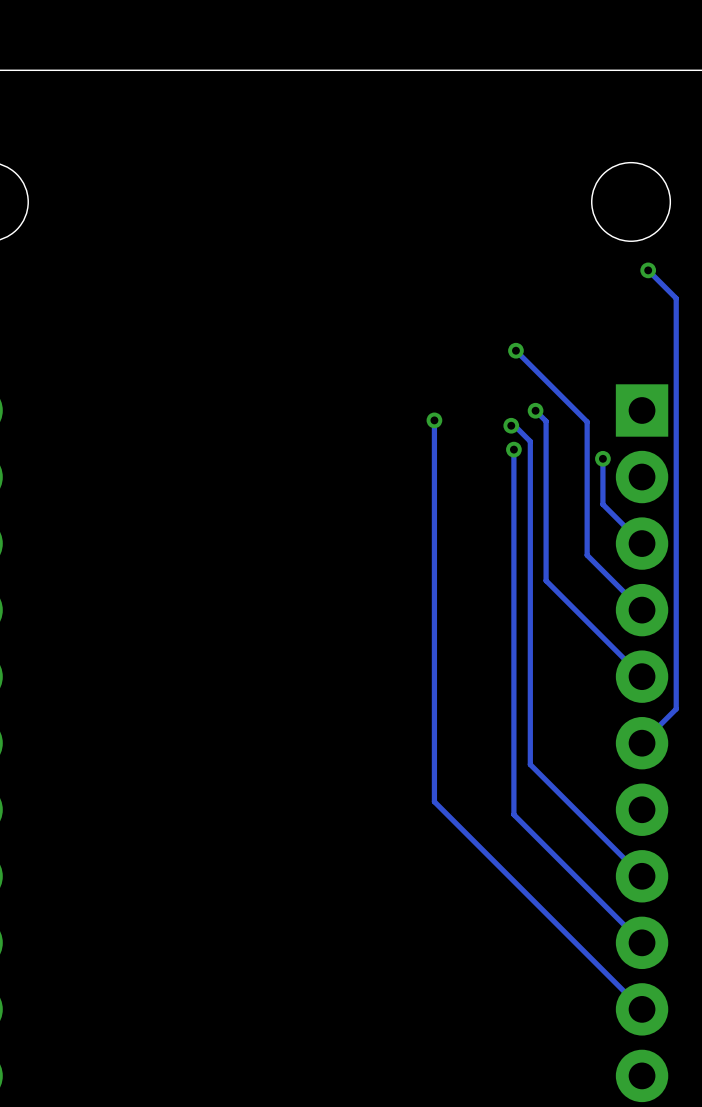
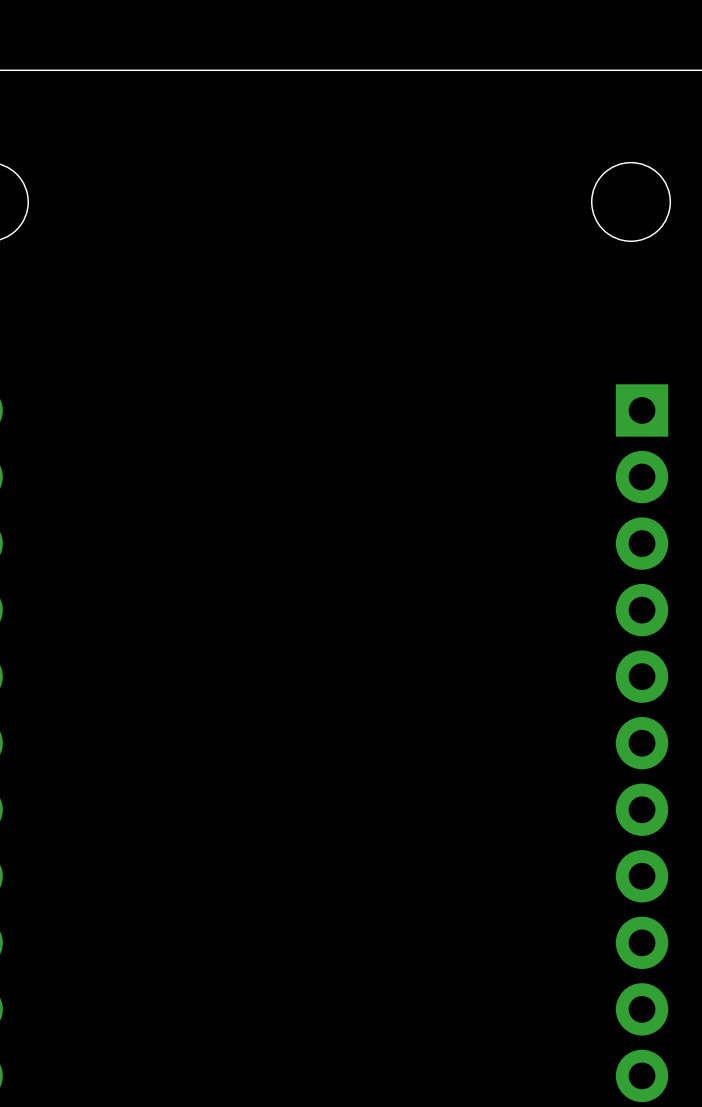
track: (648, 270) (676, 298) (676, 709) (642, 743) -> none
via: (648, 270) -> none
track: (515, 350) (587, 421) (587, 555) (642, 610) -> none
via: (515, 350) -> none
track: (535, 409) (546, 421) (546, 580) (642, 676) -> none
via: (535, 410) -> none
track: (434, 420) (434, 801) (642, 1009) -> none
via: (434, 420) -> none
track: (511, 425) (514, 425) (530, 441) (530, 764) (642, 876) -> none
via: (511, 425) -> none
track: (513, 449) (513, 814) (642, 942) -> none
via: (513, 449) -> none
track: (602, 458) (602, 504) (642, 543) -> none
via: (602, 458) -> none

